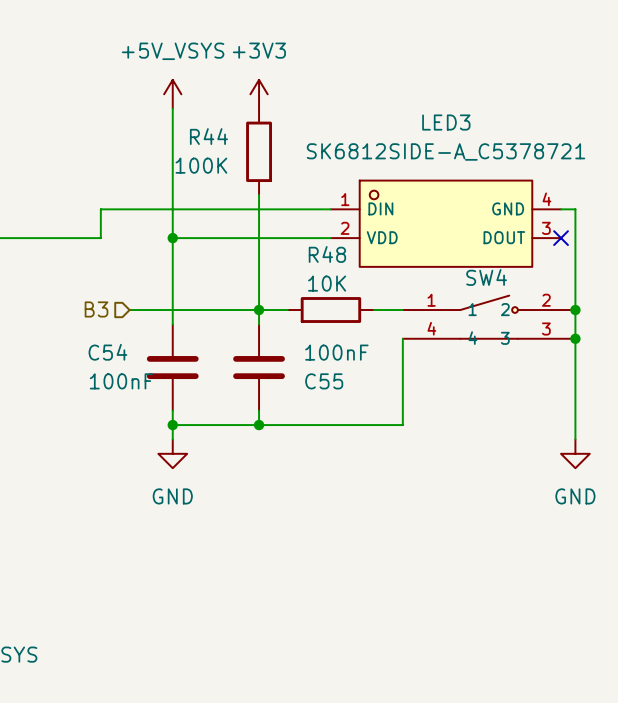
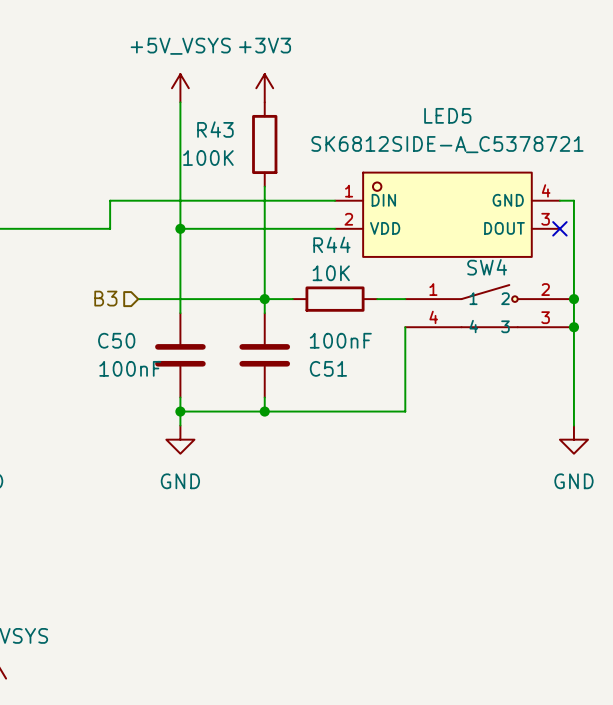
LED3 name: LED3 (446, 122) -> LED5 (447, 115)
R44 name: R44 (208, 136) -> R43 (215, 129)
R48 name: R48 (327, 254) -> R44 (331, 244)
C54 name: C54 (107, 352) -> C50 (116, 340)
C55 name: C55 (324, 381) -> C51 (328, 368)

